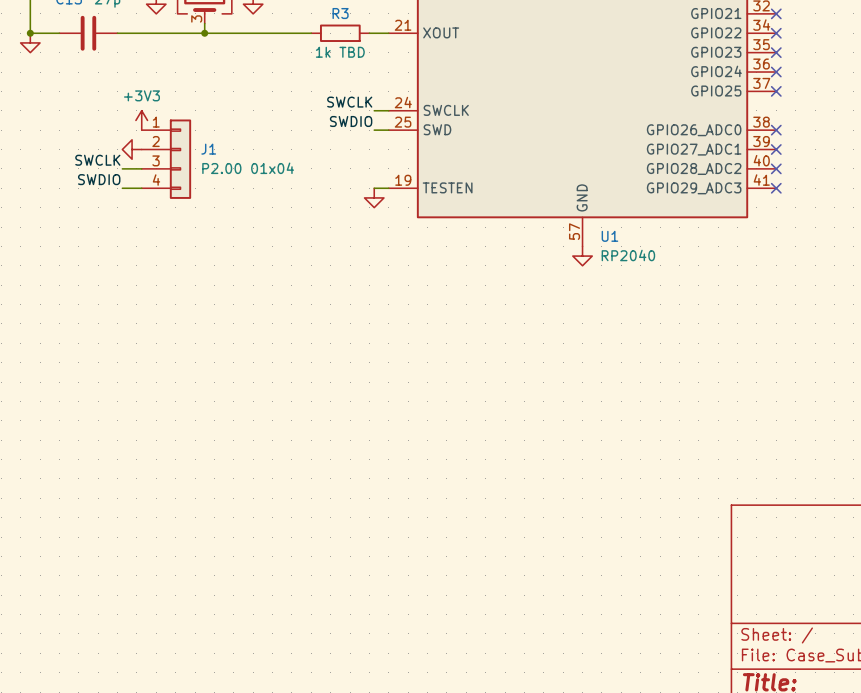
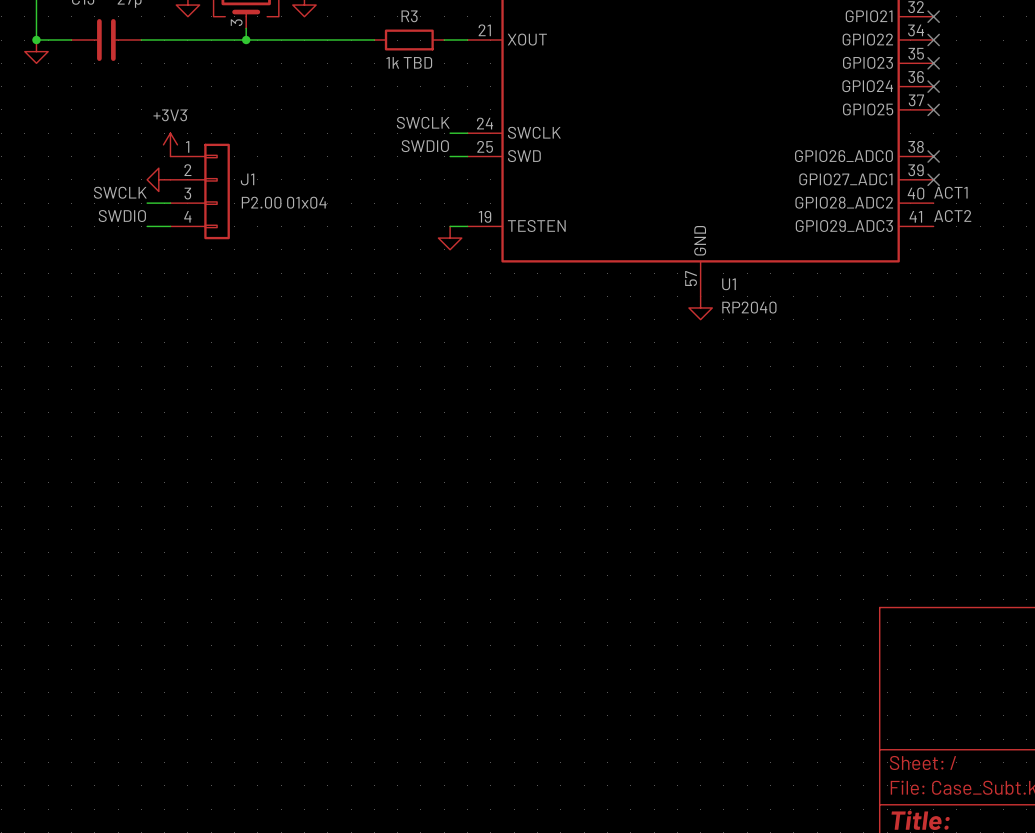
label: none -> ACT1 (950, 192)
no-connect mark: (776, 168) -> none
label: none -> ACT2 (952, 216)
no-connect mark: (776, 188) -> none

